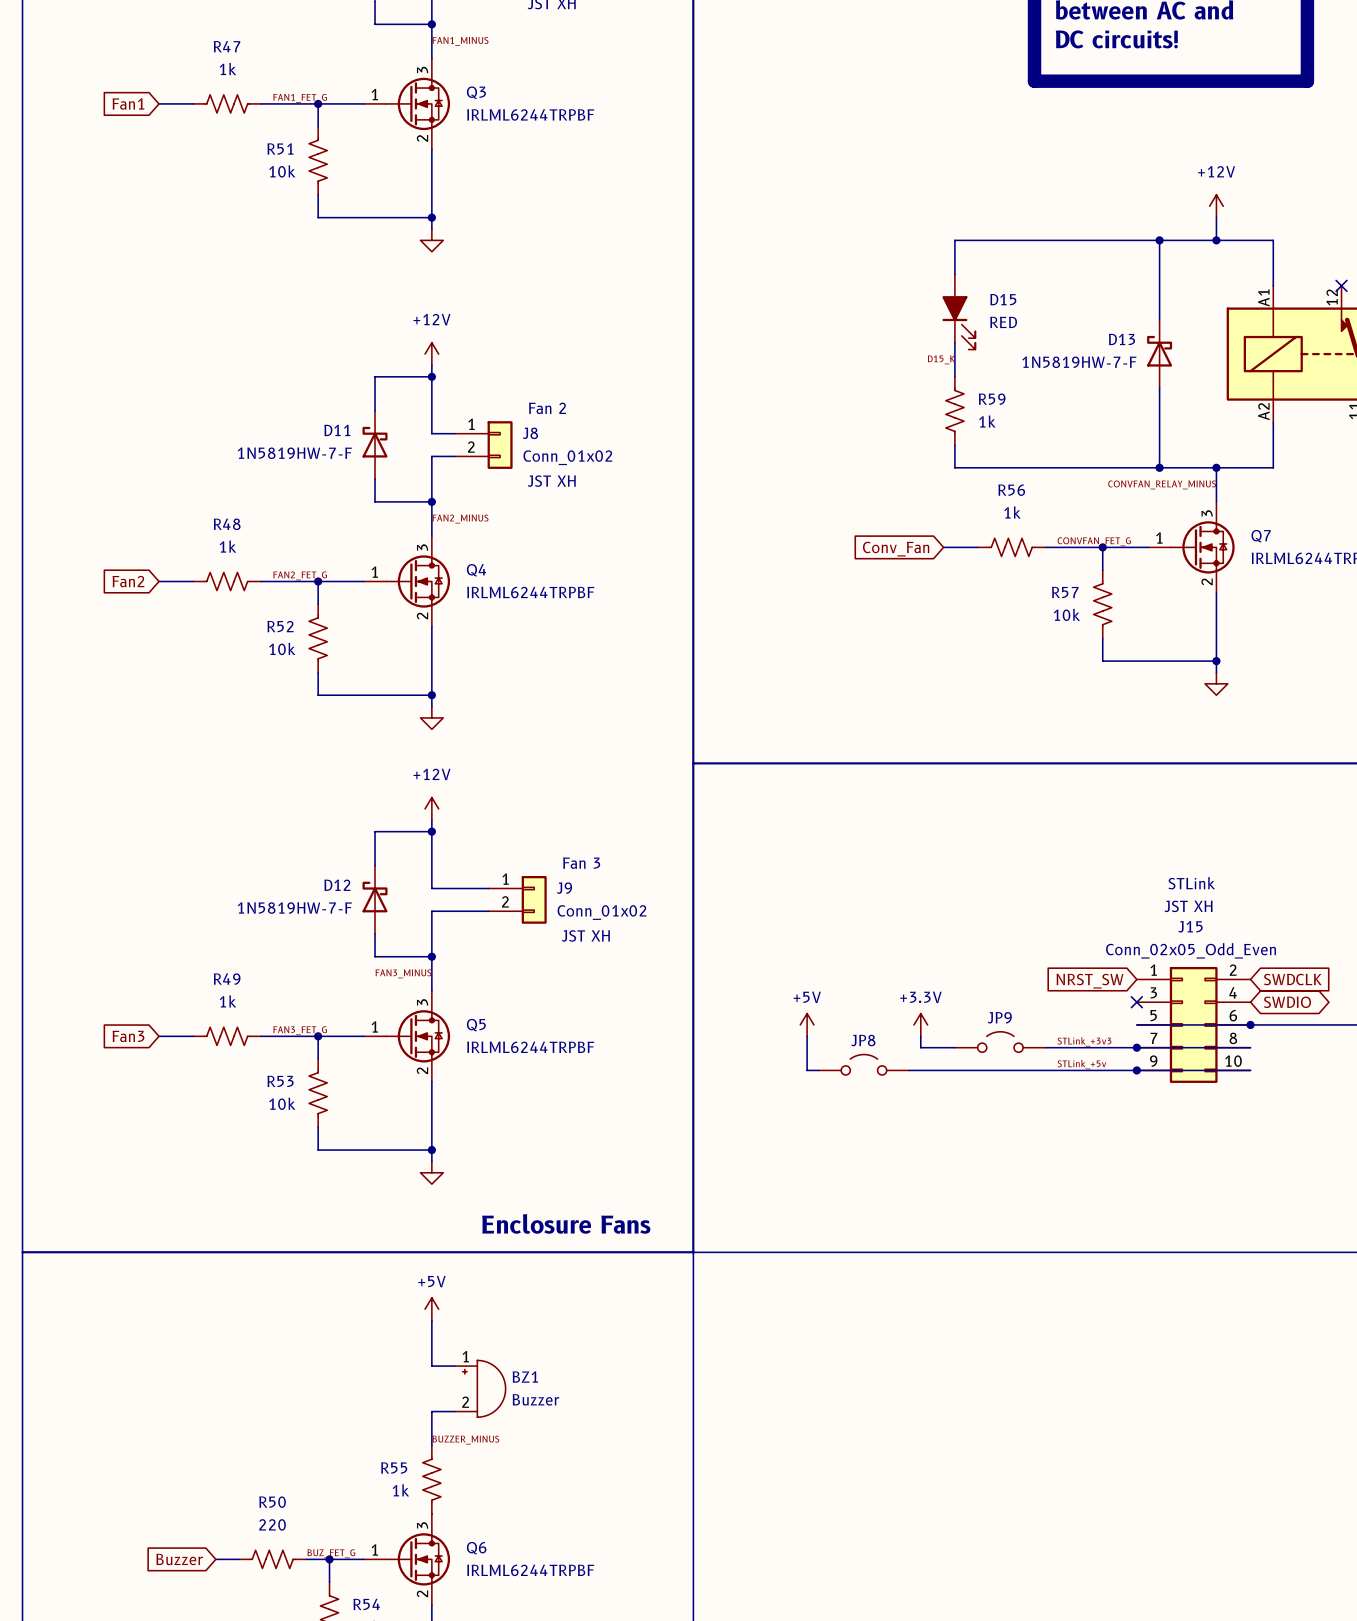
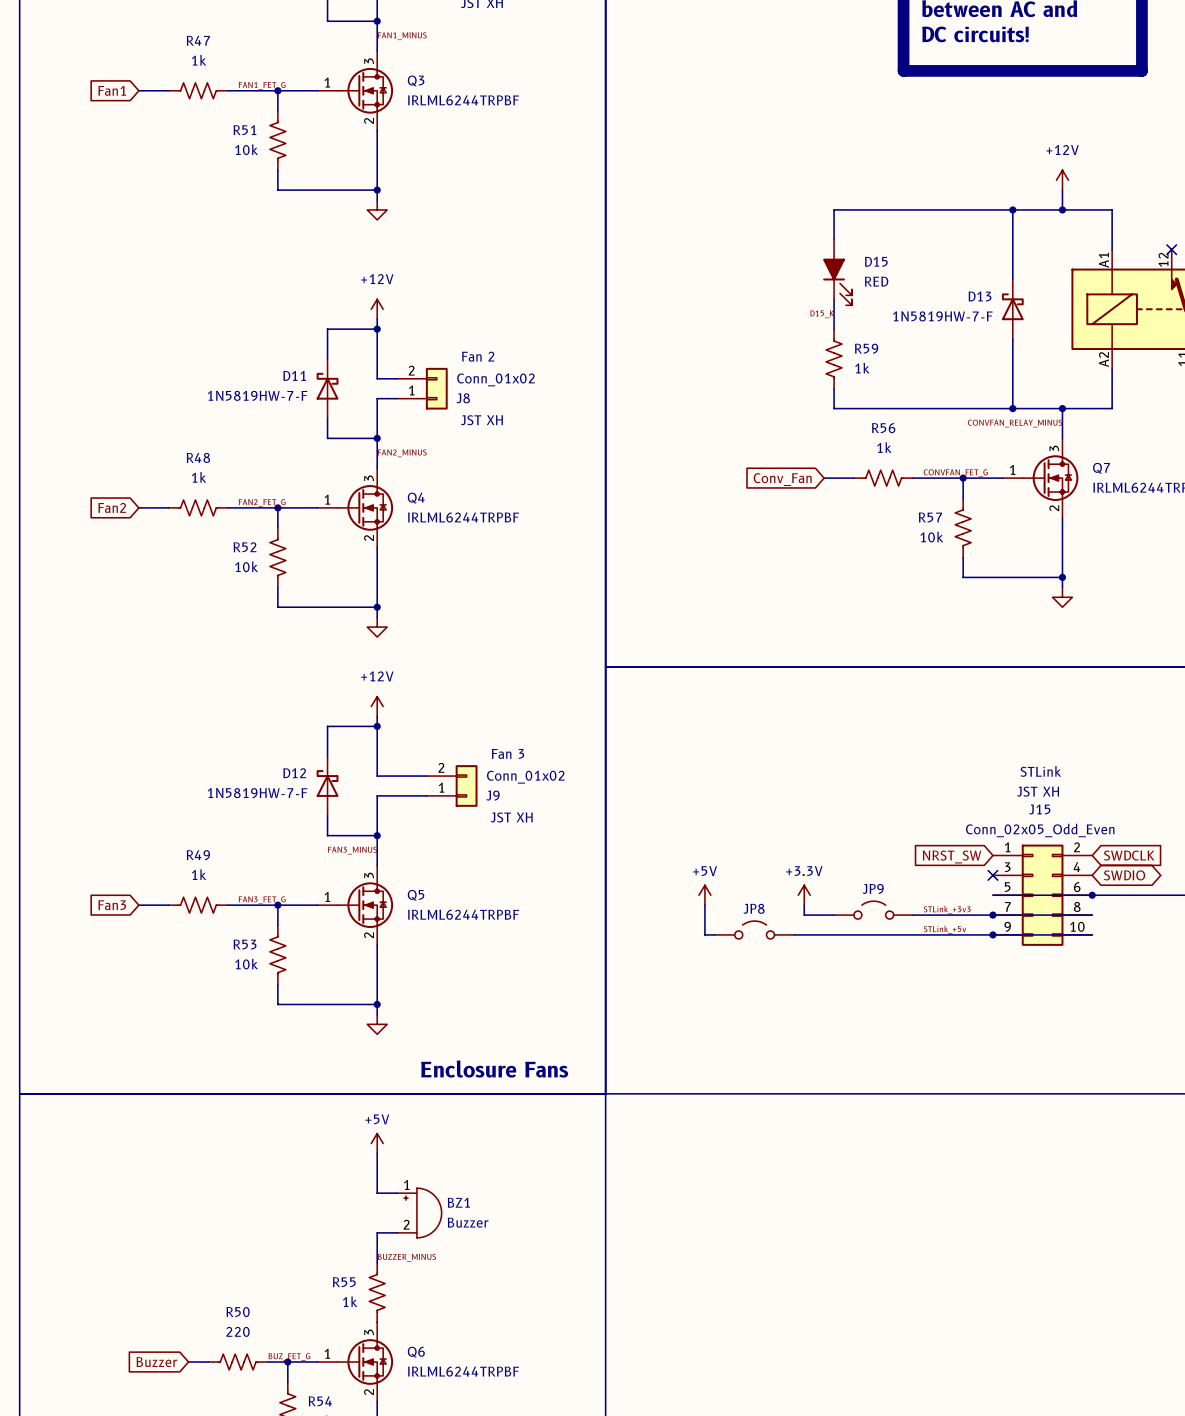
J8 flip: as is (500, 445) -> up-down (436, 388)
J9 flip: as is (534, 899) -> up-down (466, 785)

